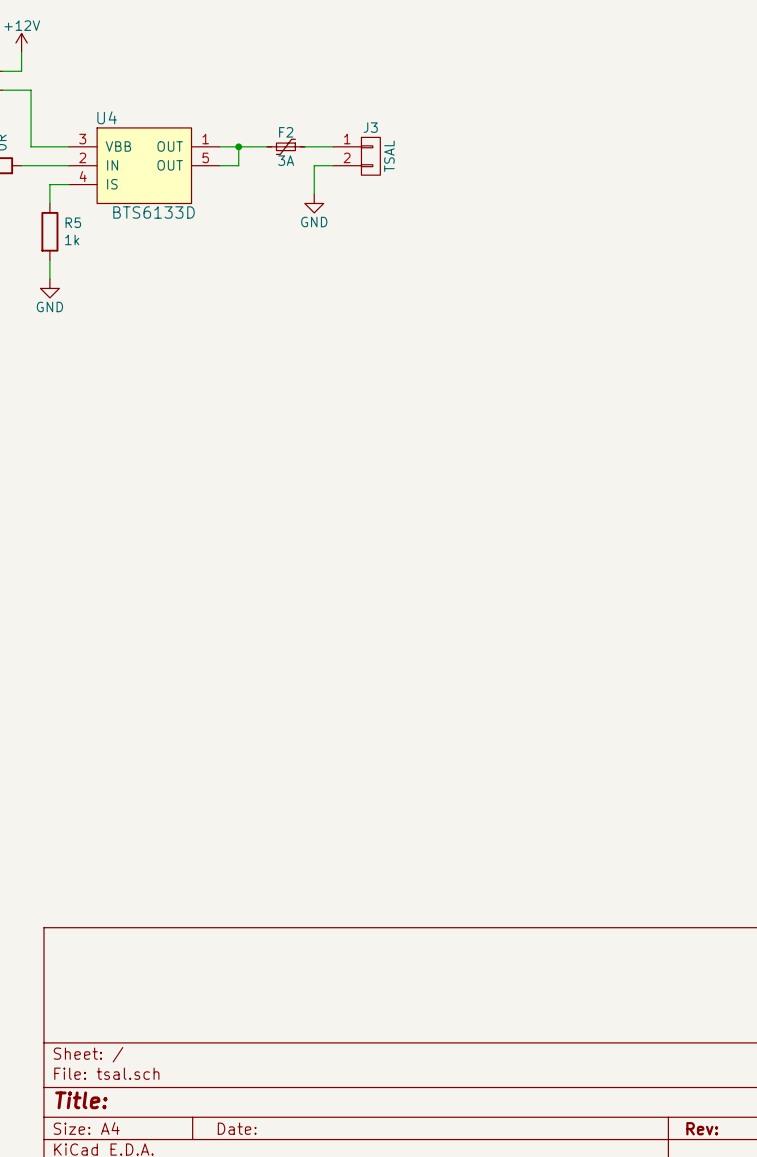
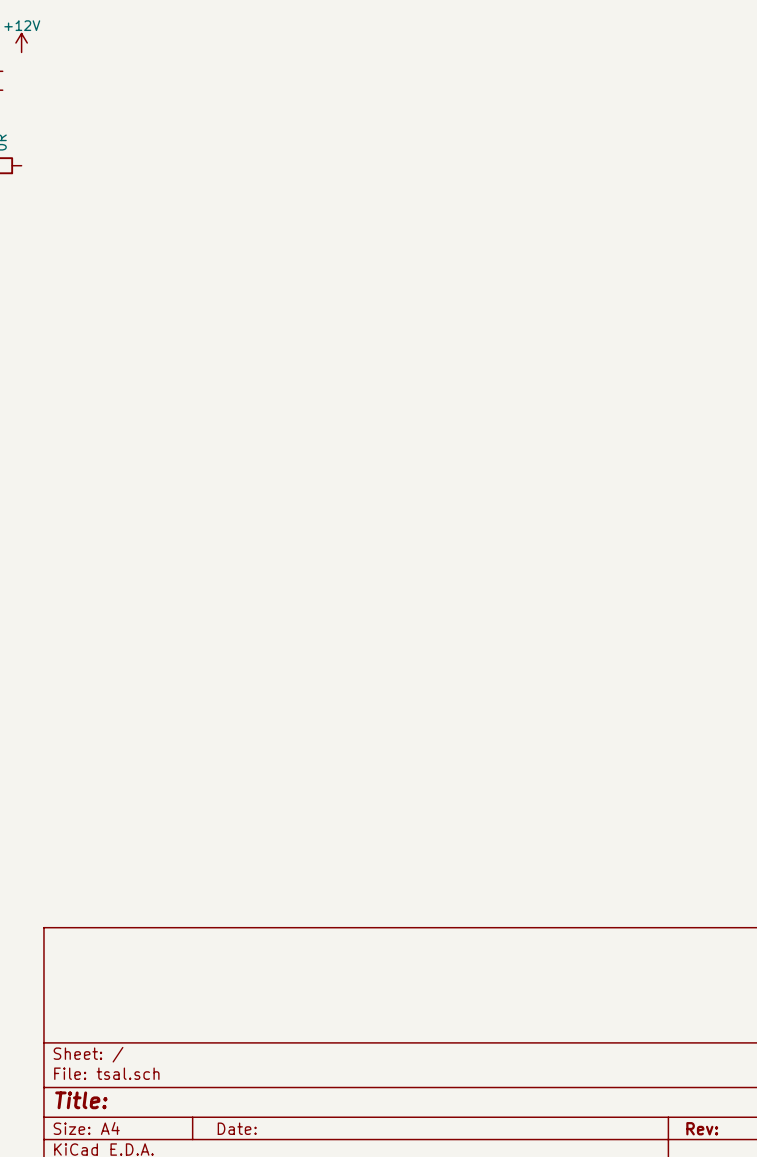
wire: (21, 52) (21, 71) (2, 71) -> none
wire: (2, 90) (31, 90) (31, 146) (68, 146) -> none
wire: (219, 146) (267, 146) -> none
wire: (238, 146) (238, 165) (219, 165) -> none
junction: (238, 146) -> none
F2: 3A (285, 146) -> none
wire: (304, 146) (333, 146) -> none
J3: TSAL (356, 156) -> none
wire: (21, 165) (68, 165) -> none
U4: BTS6133D (144, 165) -> none
wire: (333, 165) (314, 165) (314, 194) -> none
wire: (68, 184) (49, 184) (49, 203) -> none
power symbol: GND (314, 203) -> none
R5: 1k (49, 231) -> none
wire: (49, 260) (49, 279) -> none
power symbol: GND (49, 288) -> none

